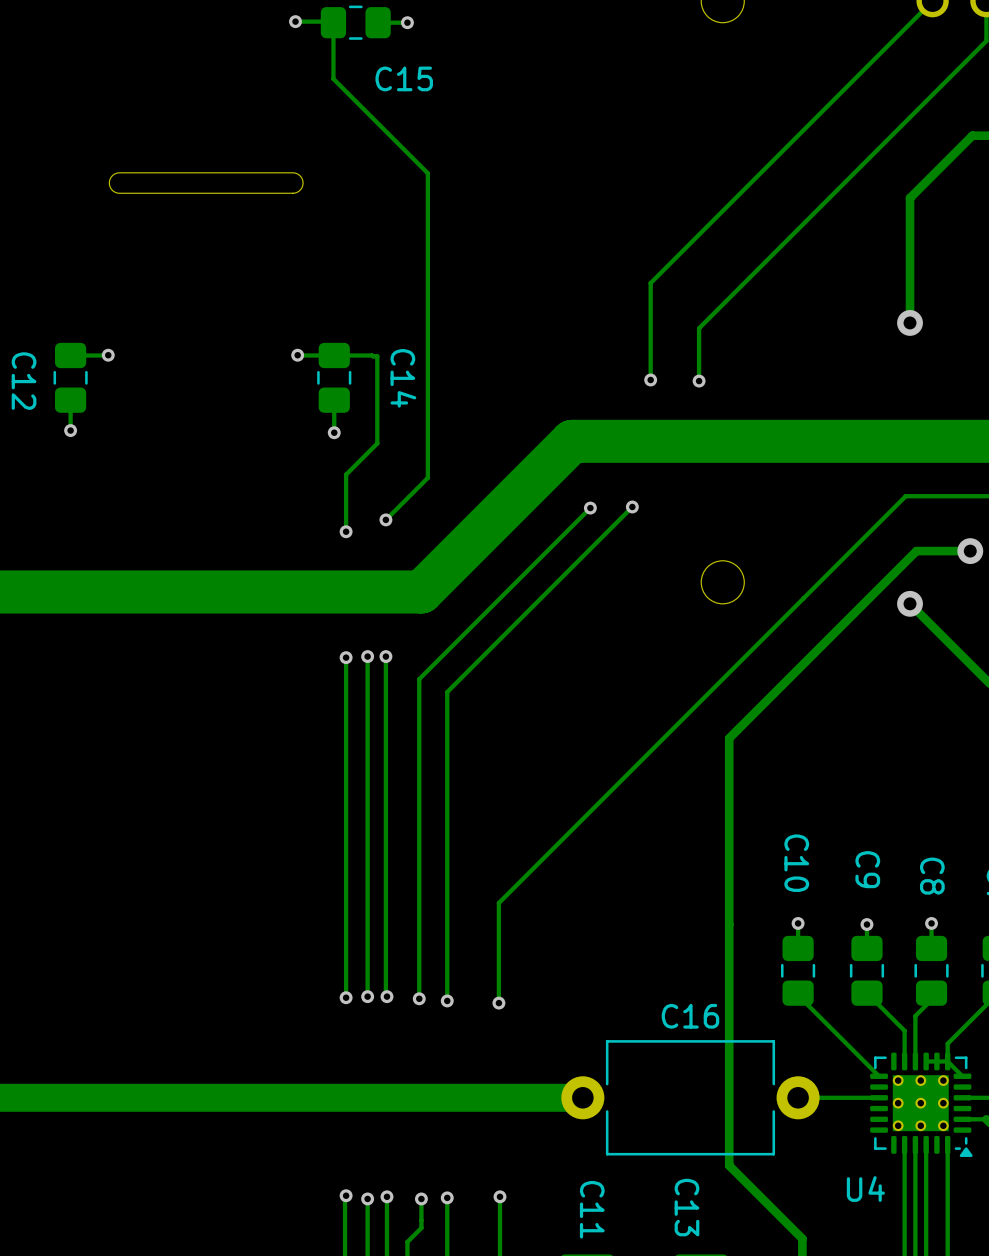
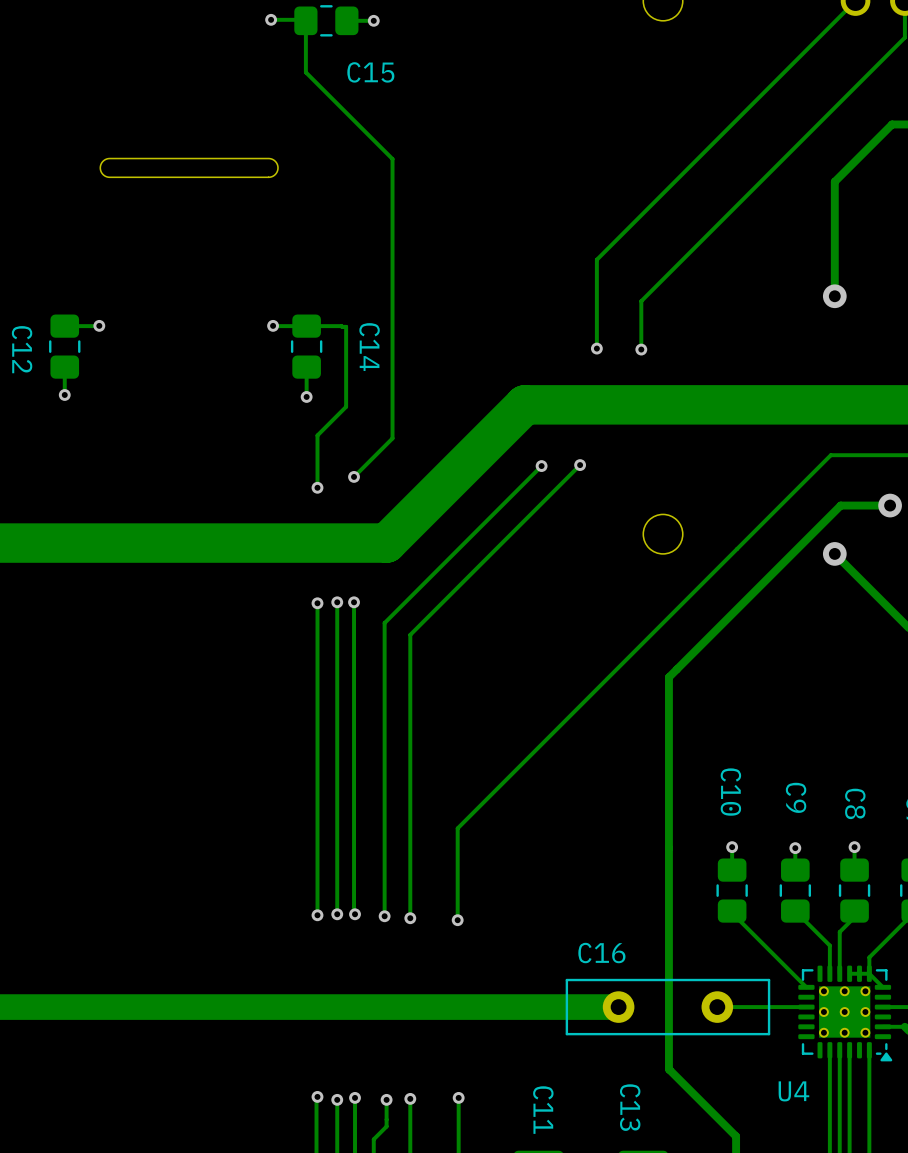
C16 name position: C16 (690, 1016) -> C16 (601, 953)
C16 footprint: [561, 1040, 820, 1156] -> [565, 978, 771, 1036]
track: none -> (618, 1007) (534, 1007)

